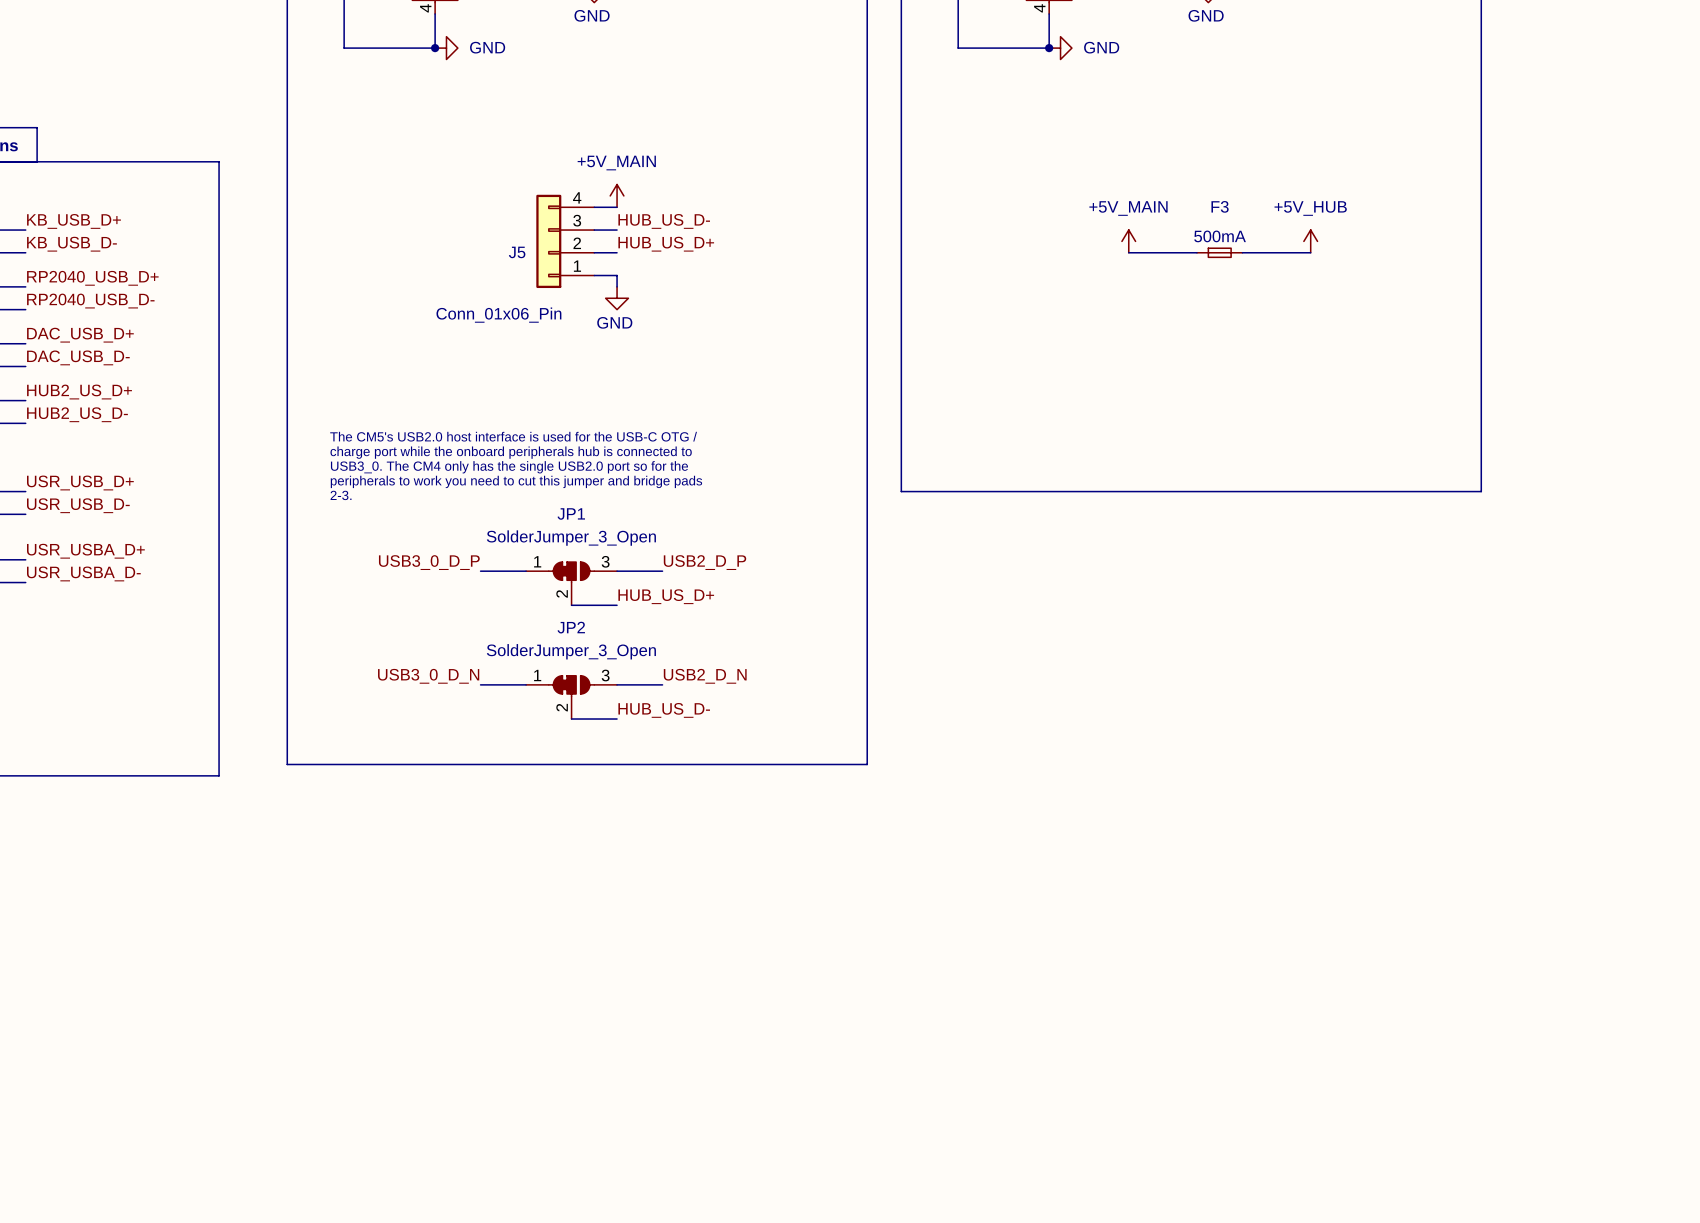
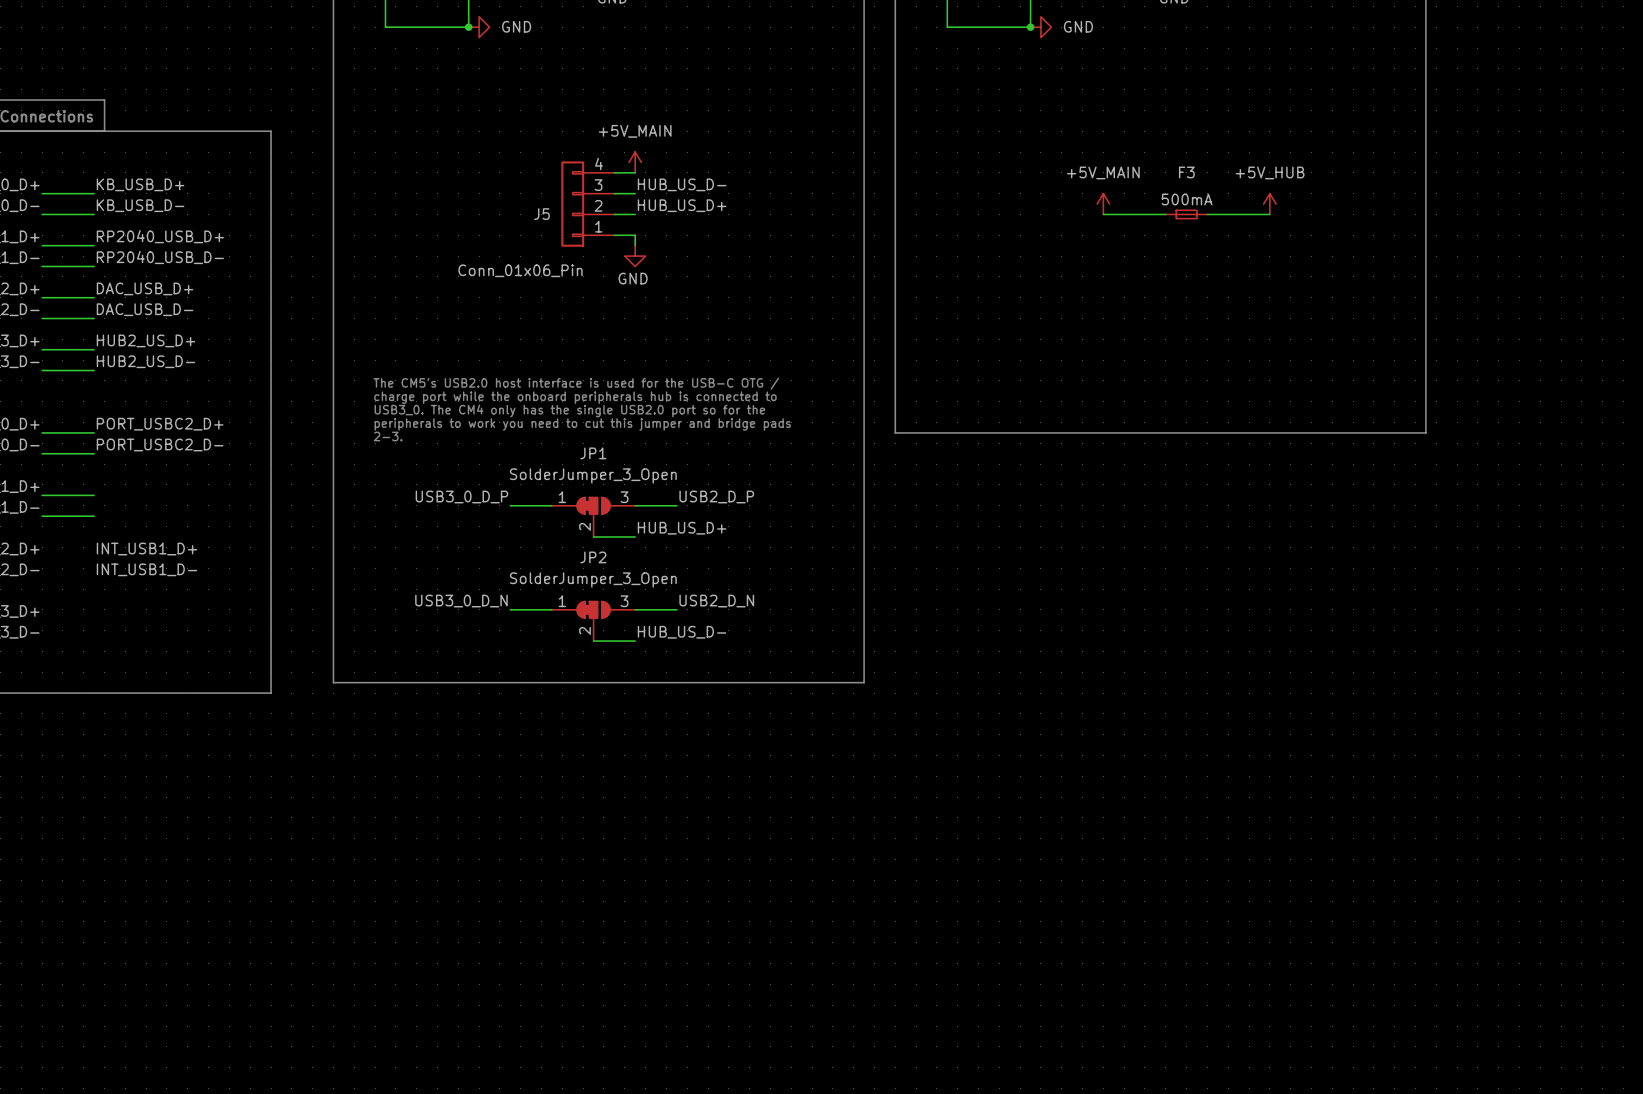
label: USR_USB_D+ (80, 482) -> PORT_USBC2_D+ (160, 424)
label: USR_USB_D- (78, 505) -> PORT_USBC2_D- (160, 444)
label: USR_USBA_D+ (85, 551) -> none
label: USR_USBA_D- (83, 573) -> none
label: none -> INT_USB1_D+ (147, 549)
label: none -> INT_USB1_D- (147, 569)

